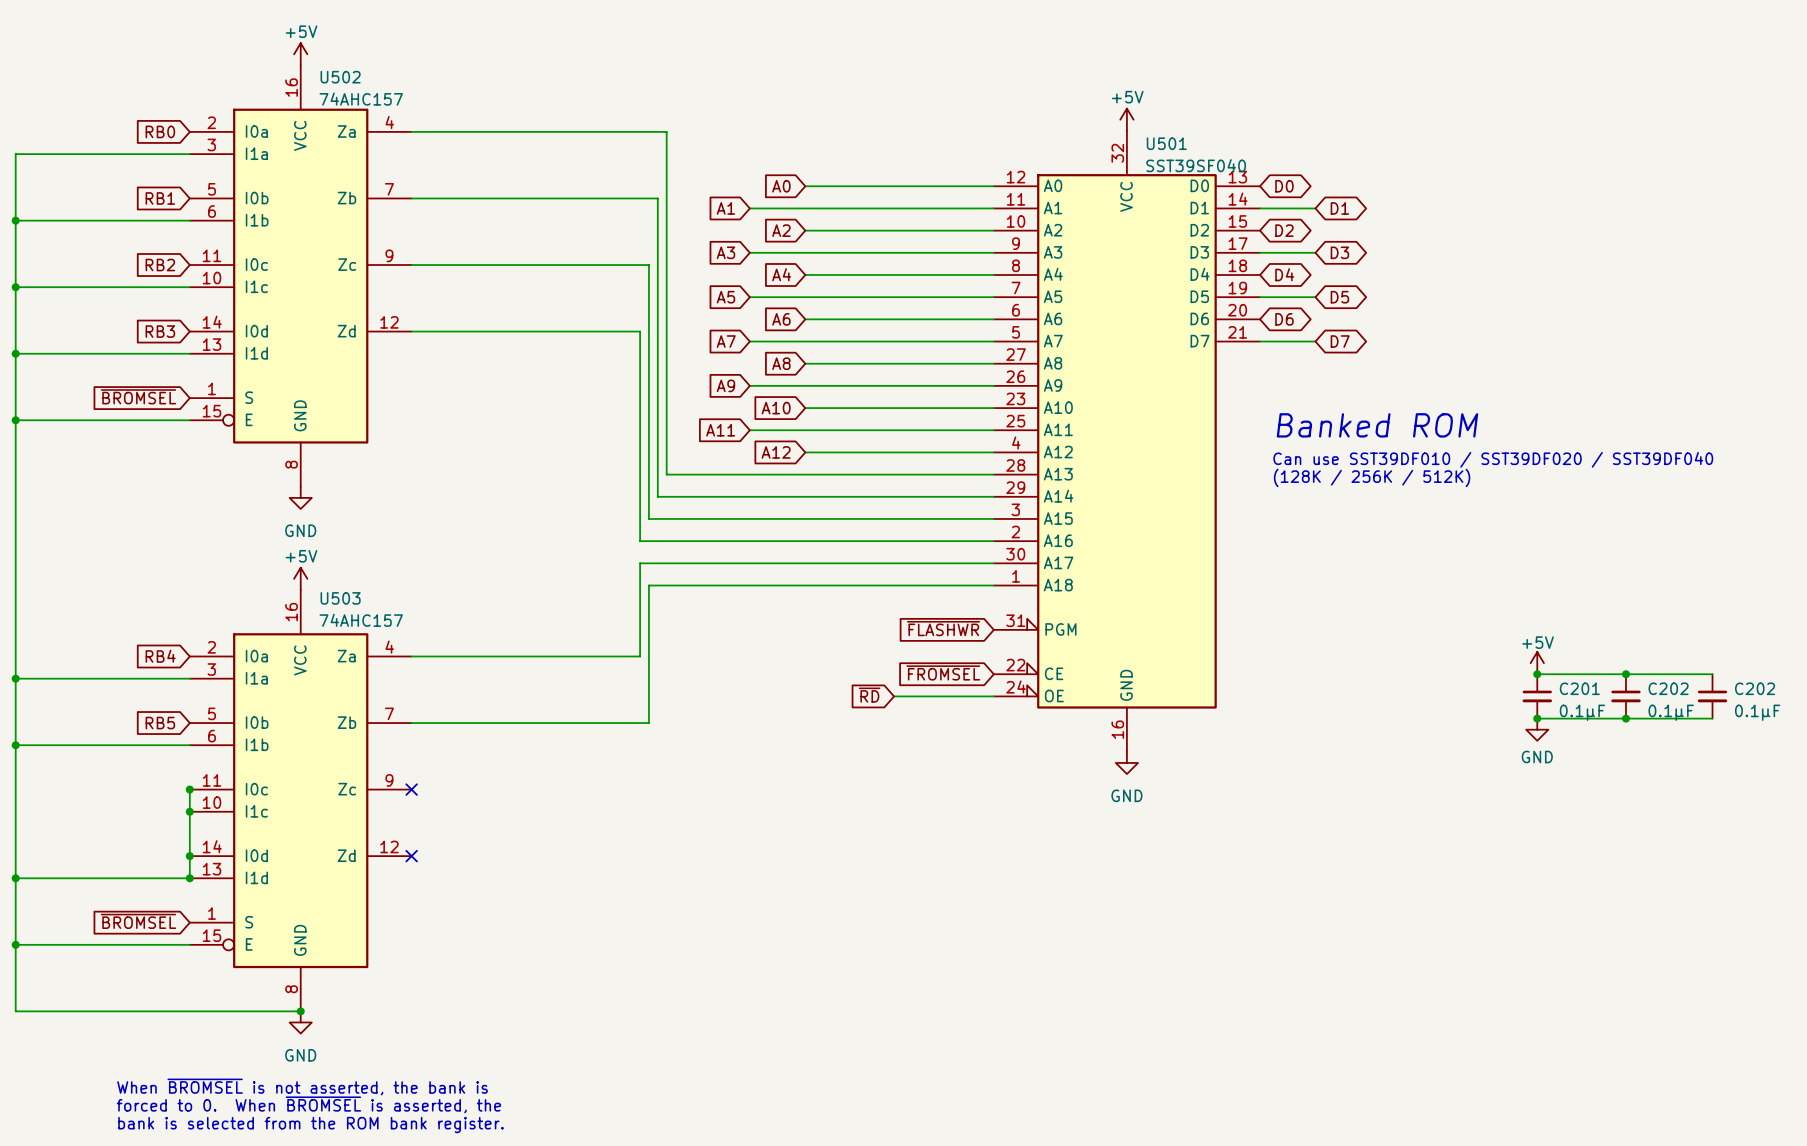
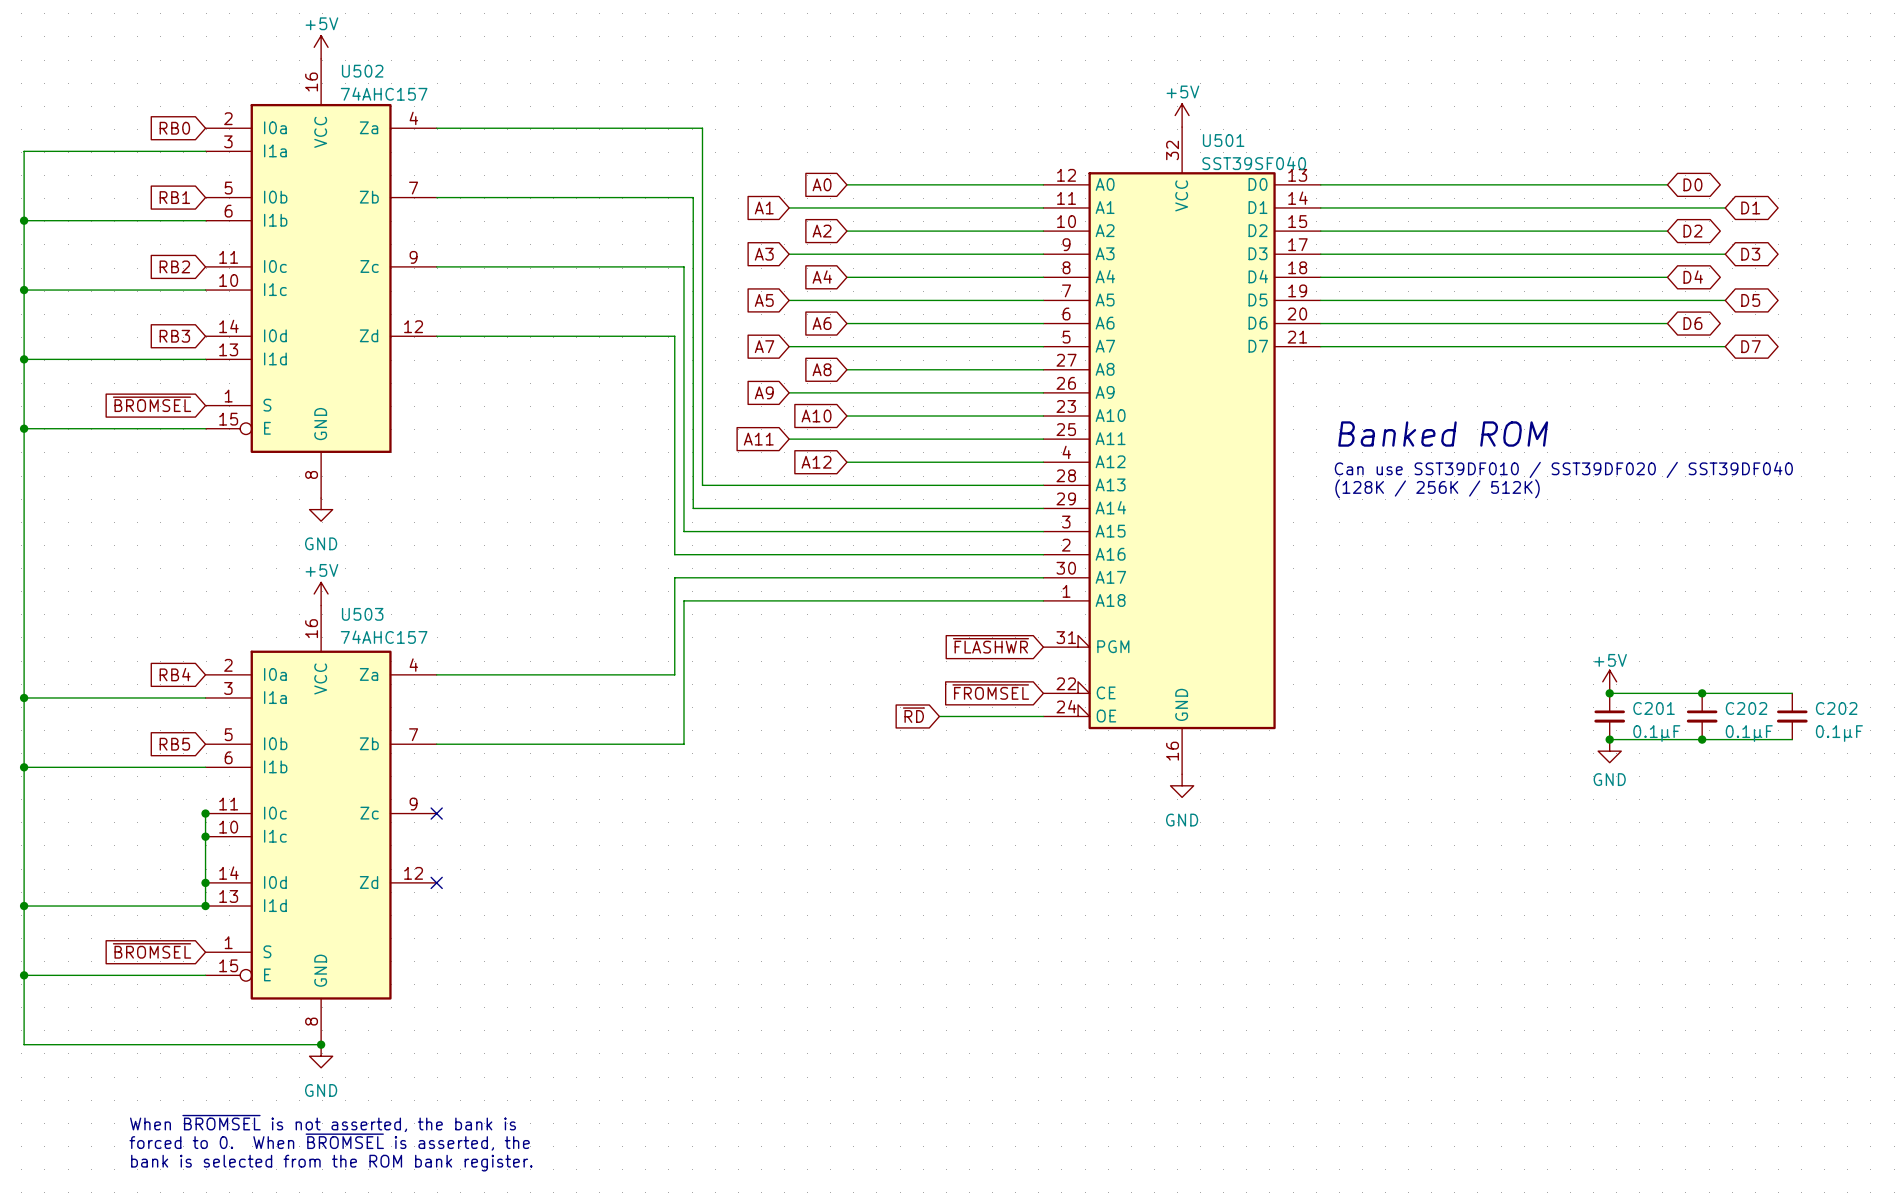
wire: none -> (1320, 184) (1667, 184)
global label: D0 (1284, 186) -> none
global label: none -> D0 (1692, 184)
wire: none -> (1378, 207) (1725, 207)
global label: D1 (1339, 208) -> none
global label: none -> D1 (1750, 207)
wire: none -> (1320, 231) (1667, 231)
global label: D2 (1284, 230) -> none
global label: none -> D2 (1692, 231)
wire: none -> (1378, 254) (1725, 254)
global label: D3 (1339, 252) -> none
global label: none -> D3 (1750, 254)
wire: none -> (1320, 277) (1667, 277)
global label: D4 (1284, 274) -> none
global label: none -> D4 (1693, 277)
wire: none -> (1378, 300) (1725, 300)
global label: D5 (1339, 297) -> none
global label: none -> D5 (1750, 300)
wire: none -> (1320, 323) (1667, 323)
global label: D6 (1284, 319) -> none
global label: none -> D6 (1692, 323)
wire: none -> (1378, 346) (1725, 346)
global label: D7 (1340, 341) -> none
global label: none -> D7 (1751, 346)

